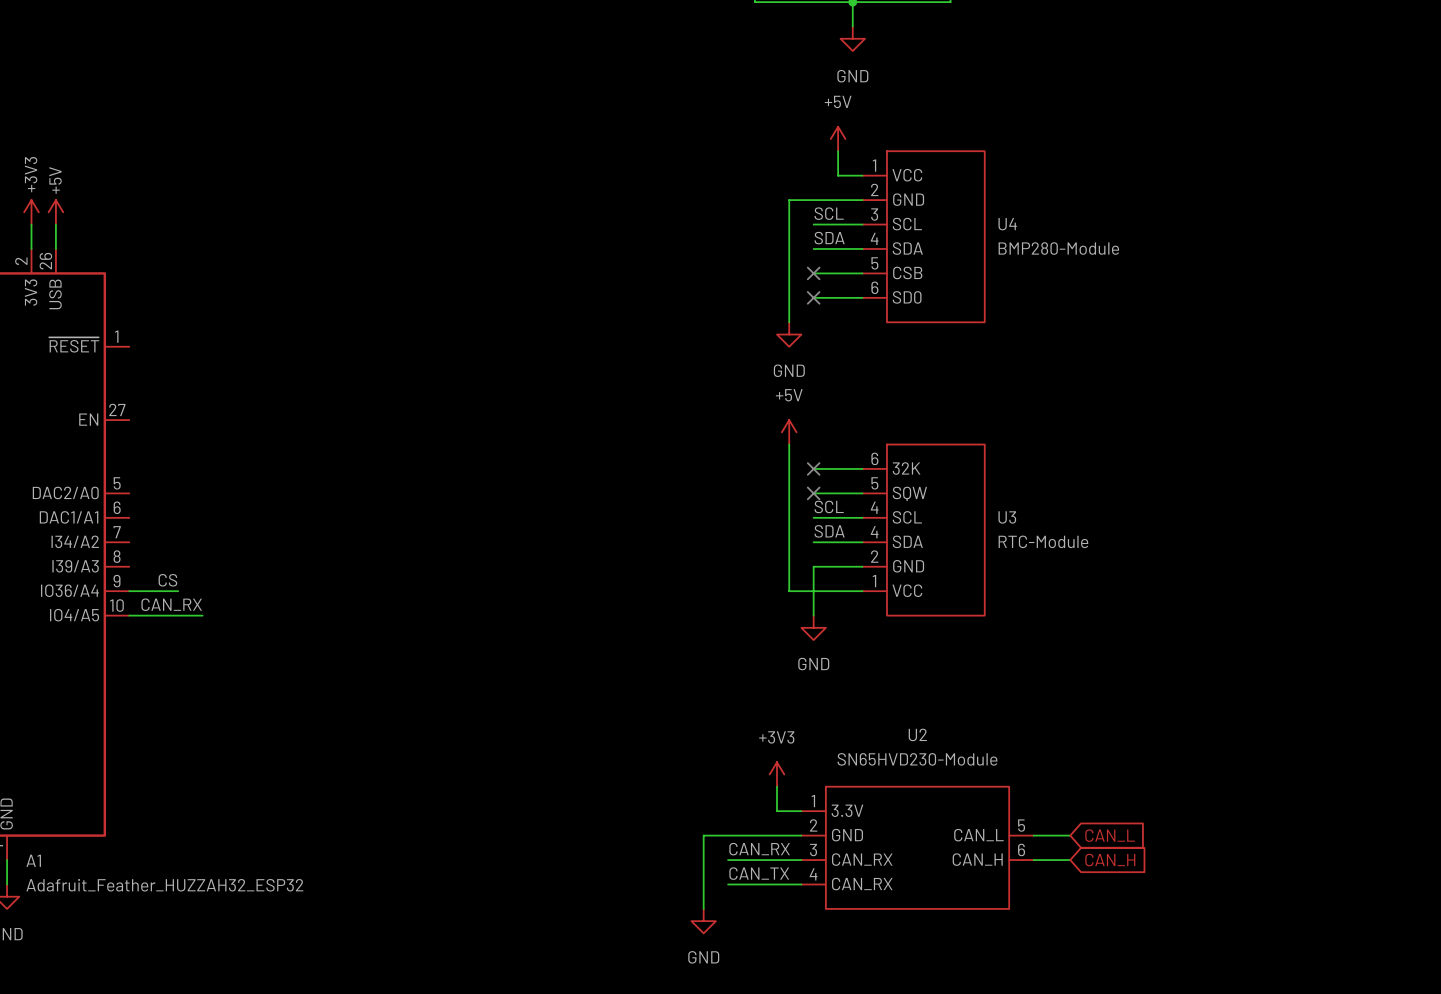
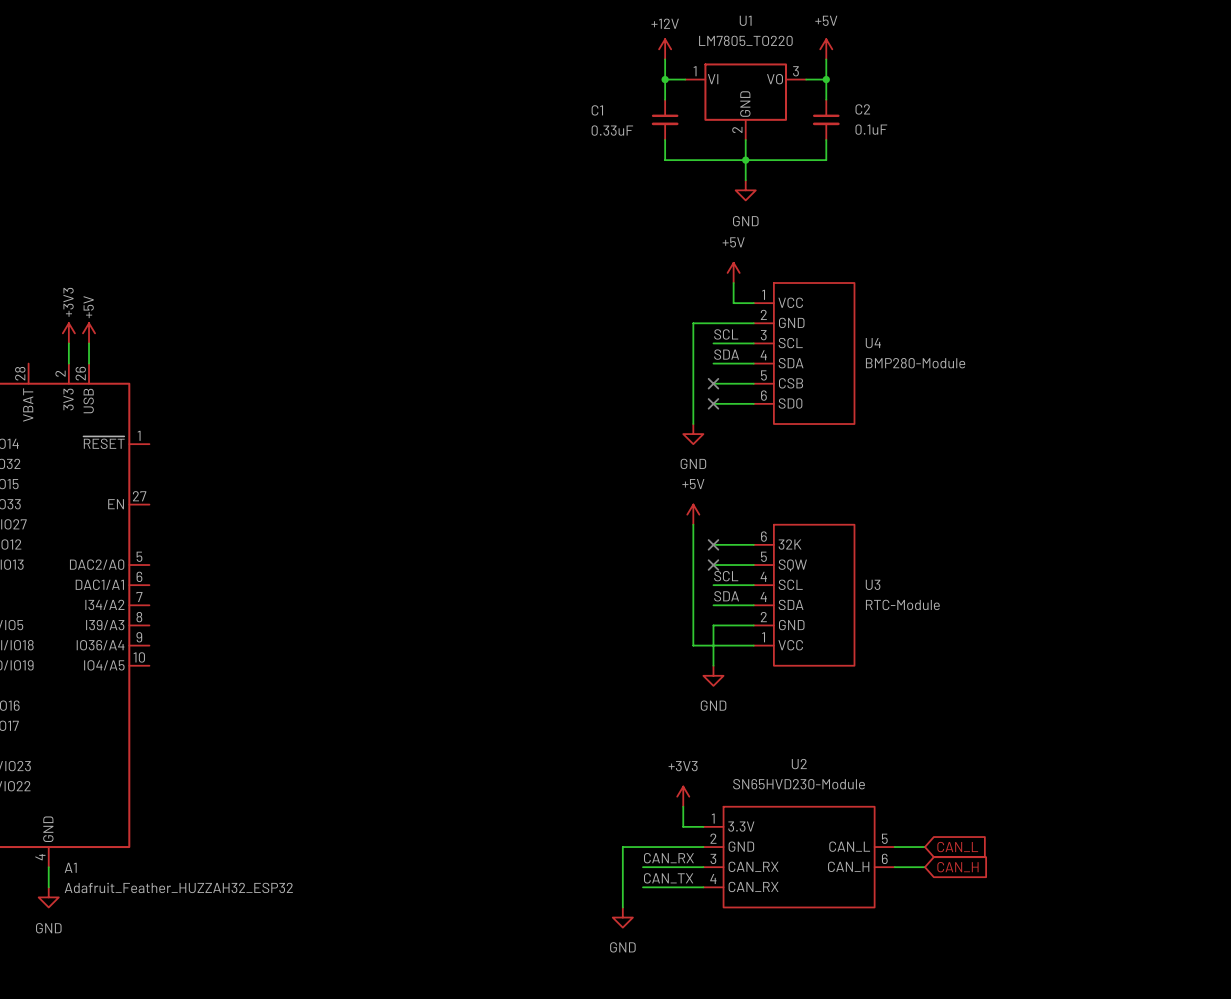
label: CS (167, 580) -> none
wire: (129, 591) (178, 591) -> none
label: CAN_RX (171, 604) -> none
wire: (129, 615) (202, 615) -> none

